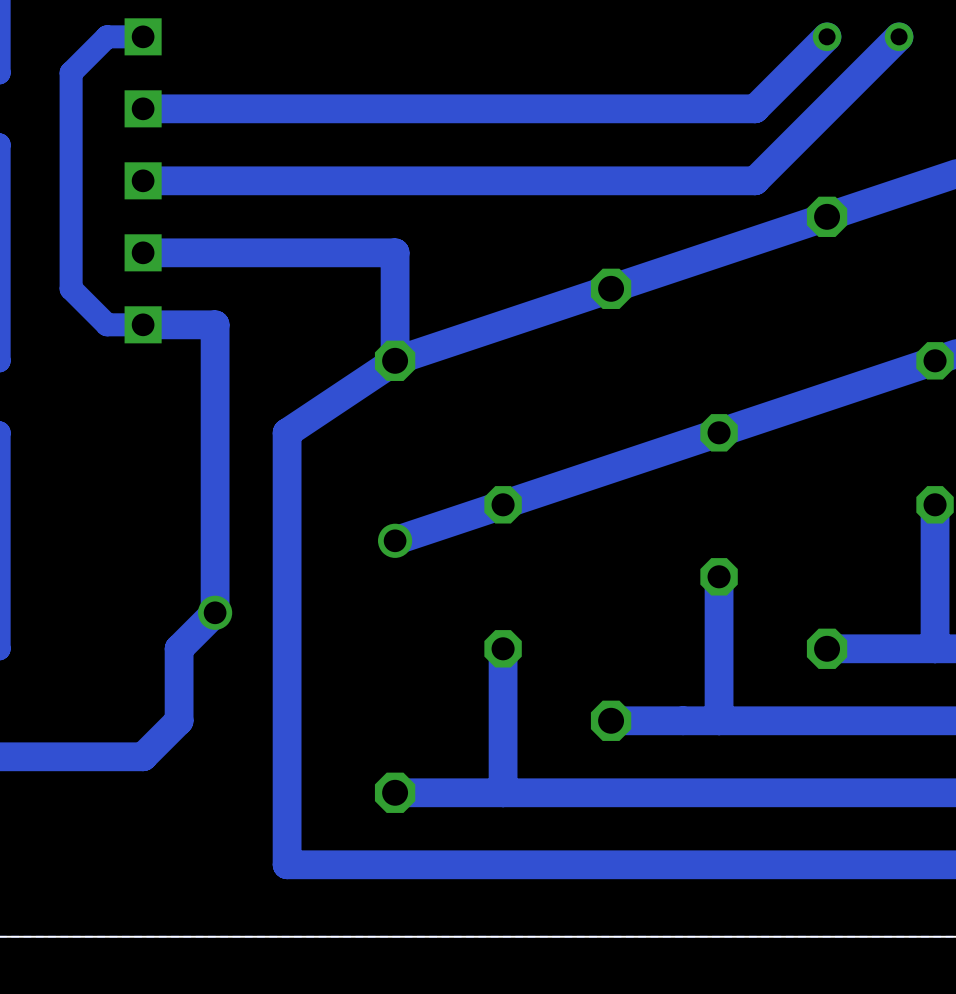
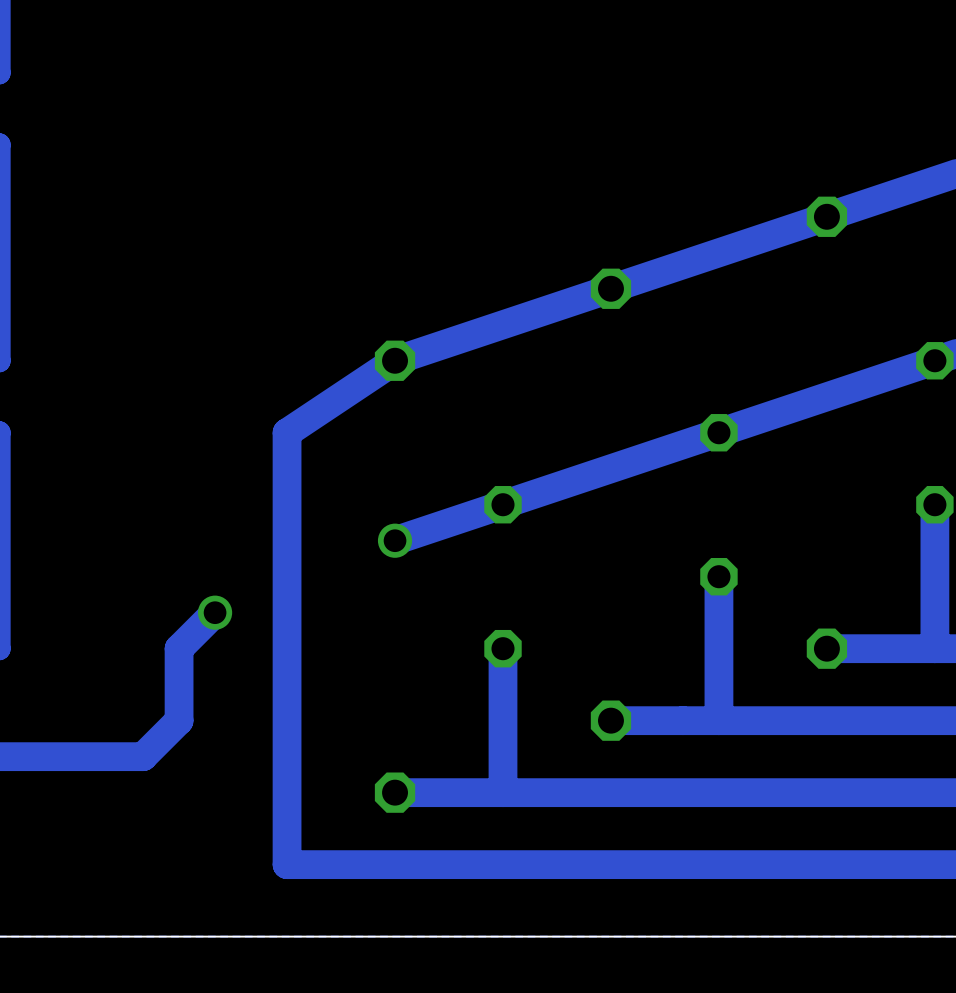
track: (143, 36) (107, 36) (71, 72) (71, 288) (107, 324) (215, 324) (215, 612) -> none
track: (827, 36) (755, 108) (143, 108) -> none
via: (827, 36) -> none
track: (899, 36) (755, 180) (143, 180) -> none
via: (899, 36) -> none
part: (143, 180) -> none
track: (143, 252) (395, 252) (395, 360) -> none

